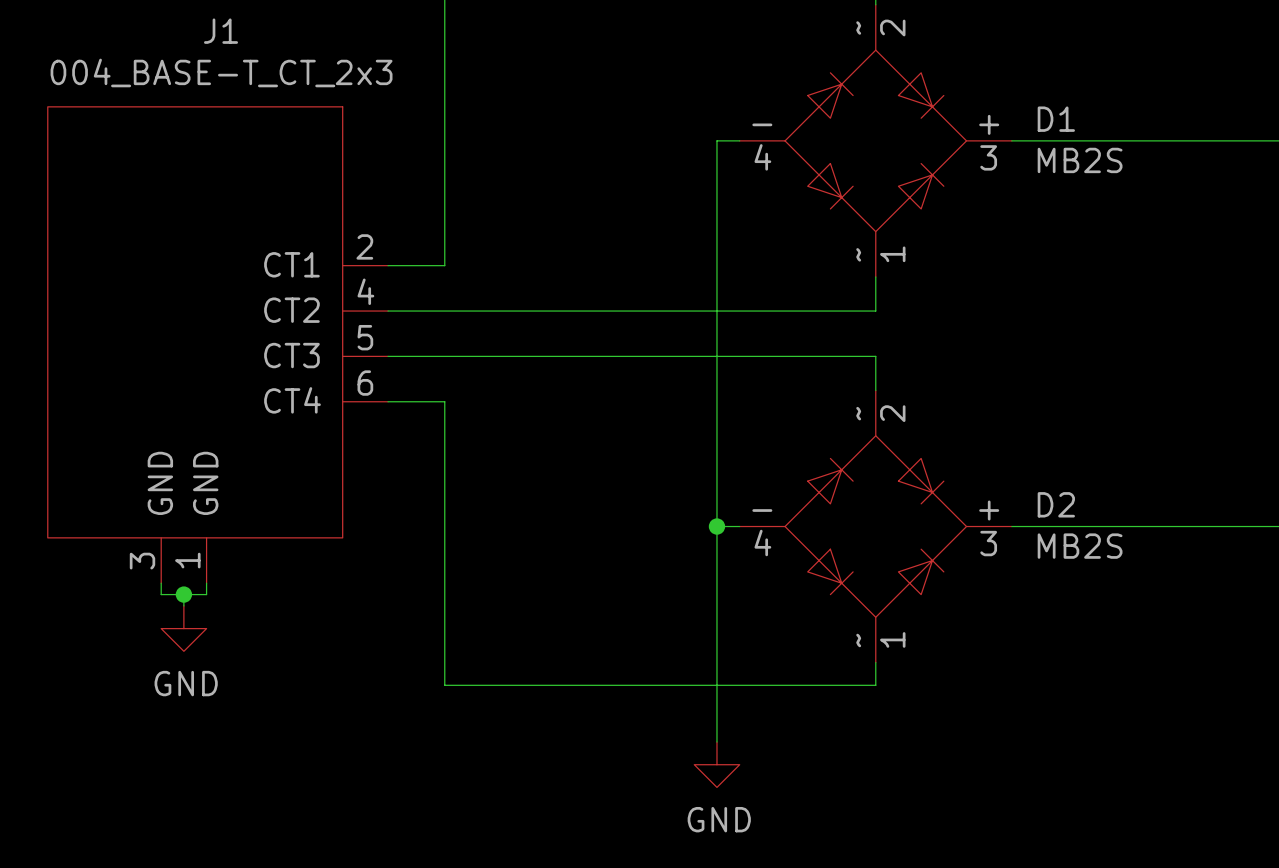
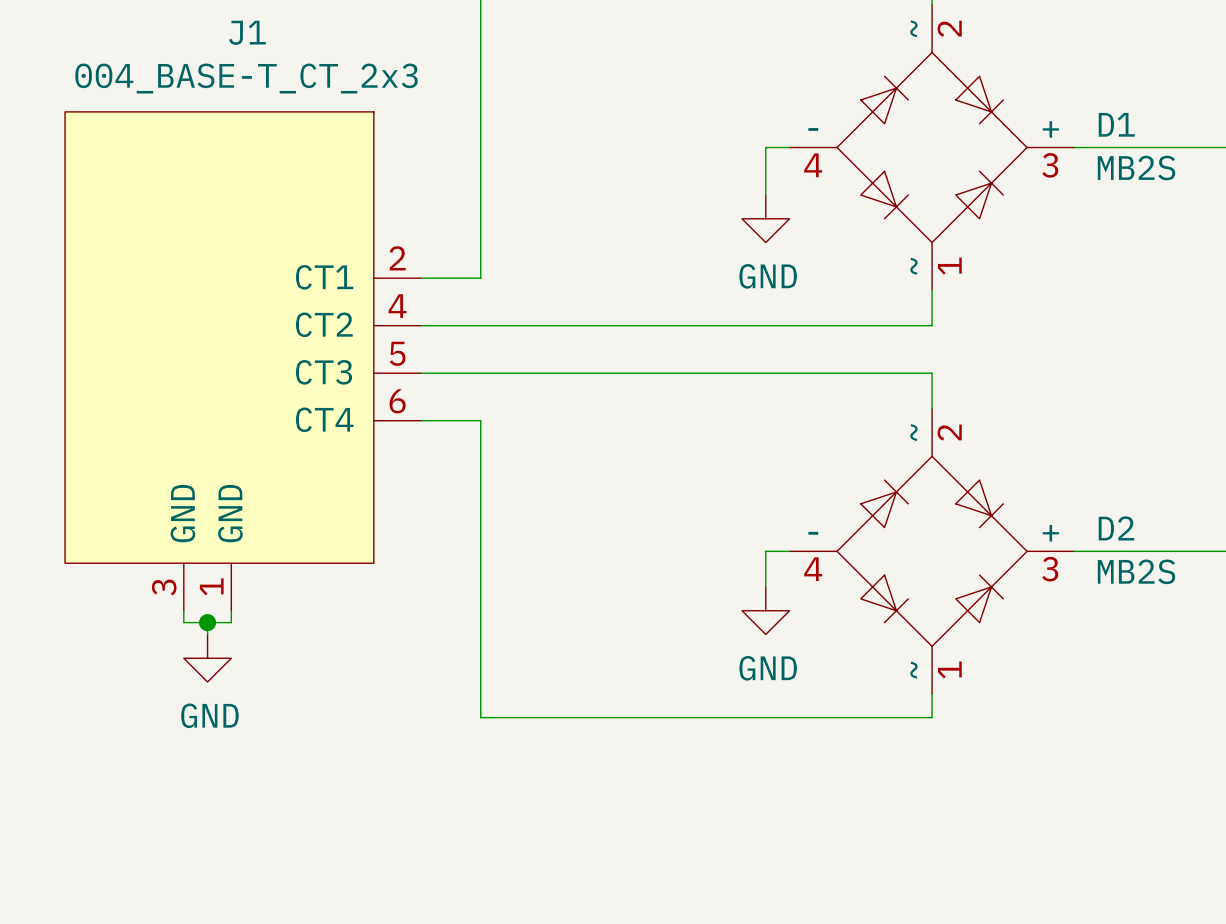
wire: (716, 186) (716, 526) -> none
power symbol: none -> GND (765, 218)
junction: (716, 526) -> none
wire: (716, 560) (716, 742) -> none
power symbol position: GND (716, 764) -> GND (765, 610)

